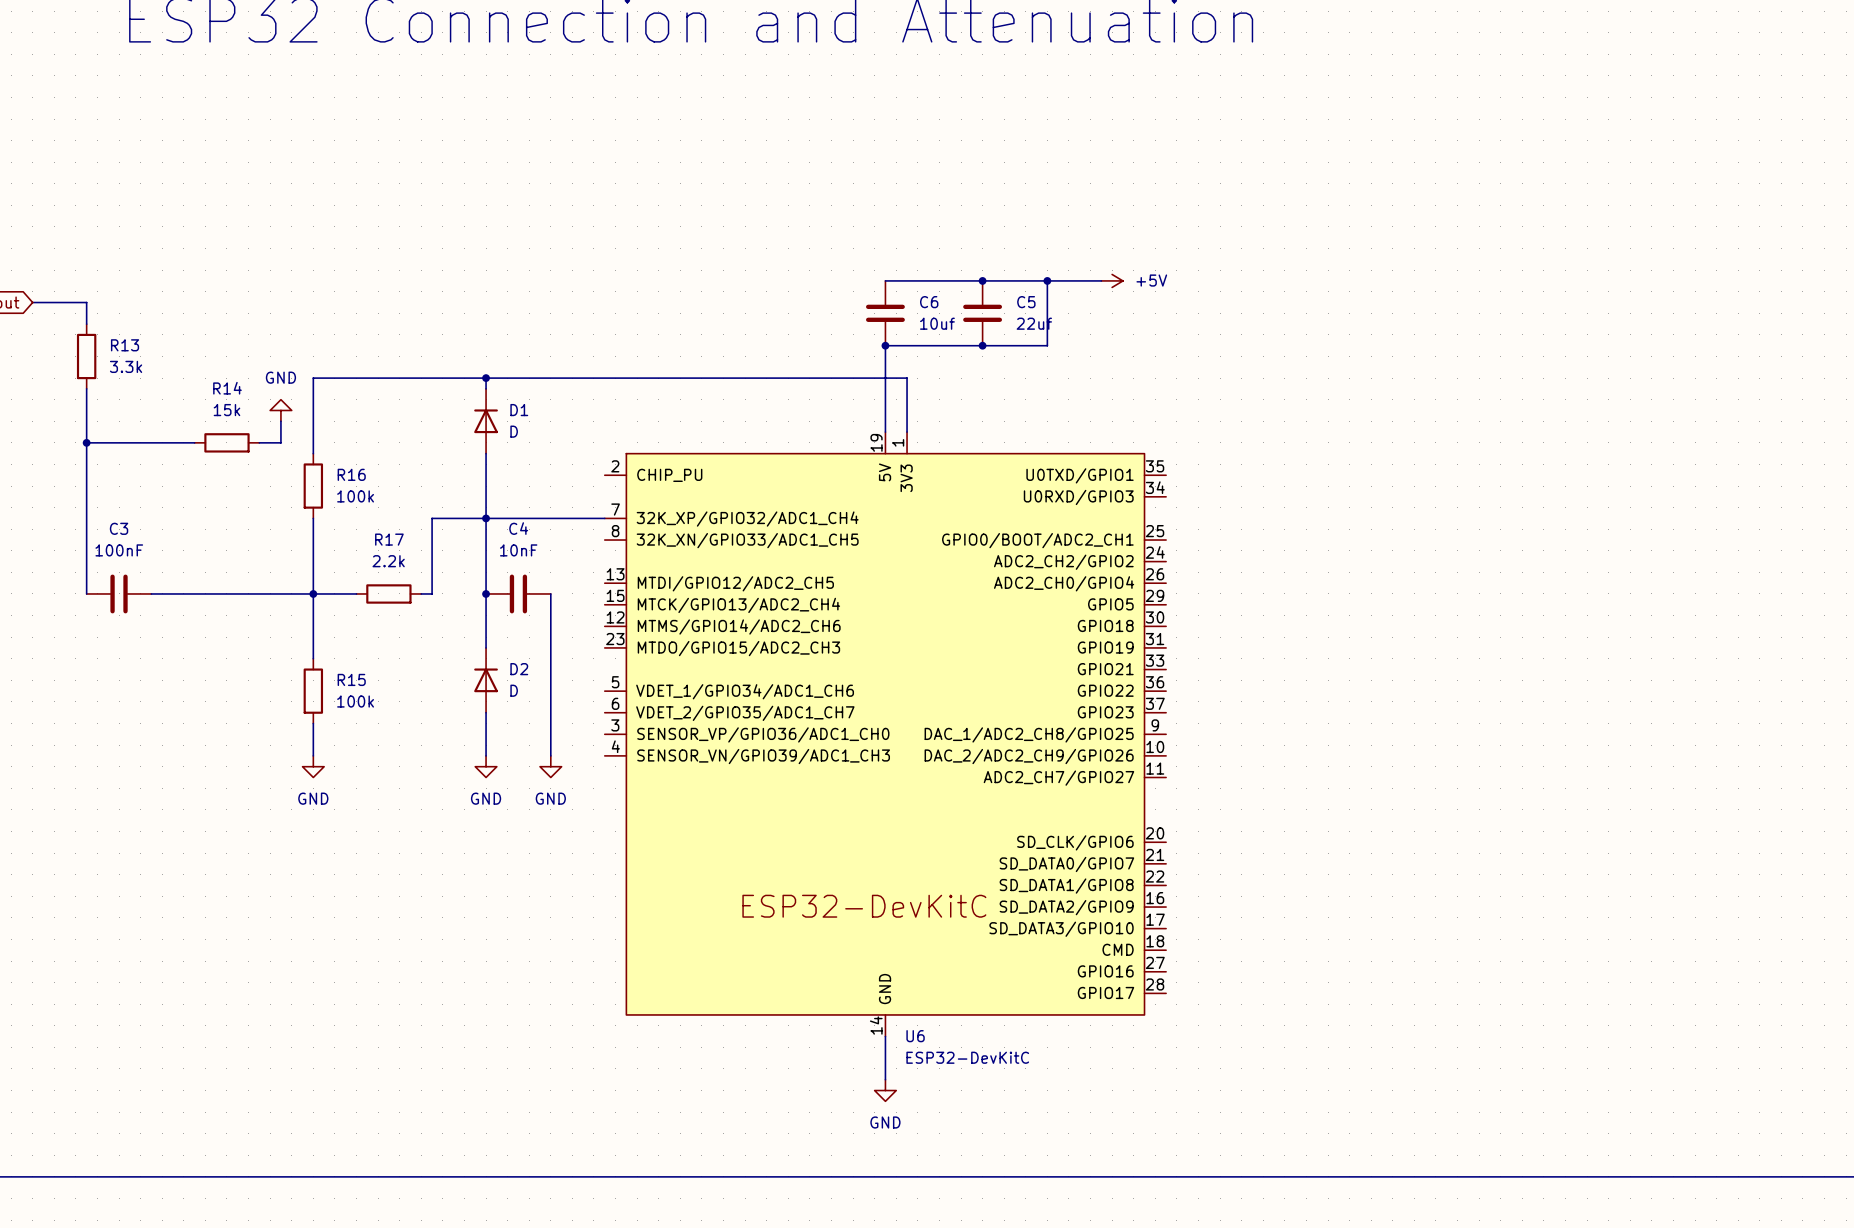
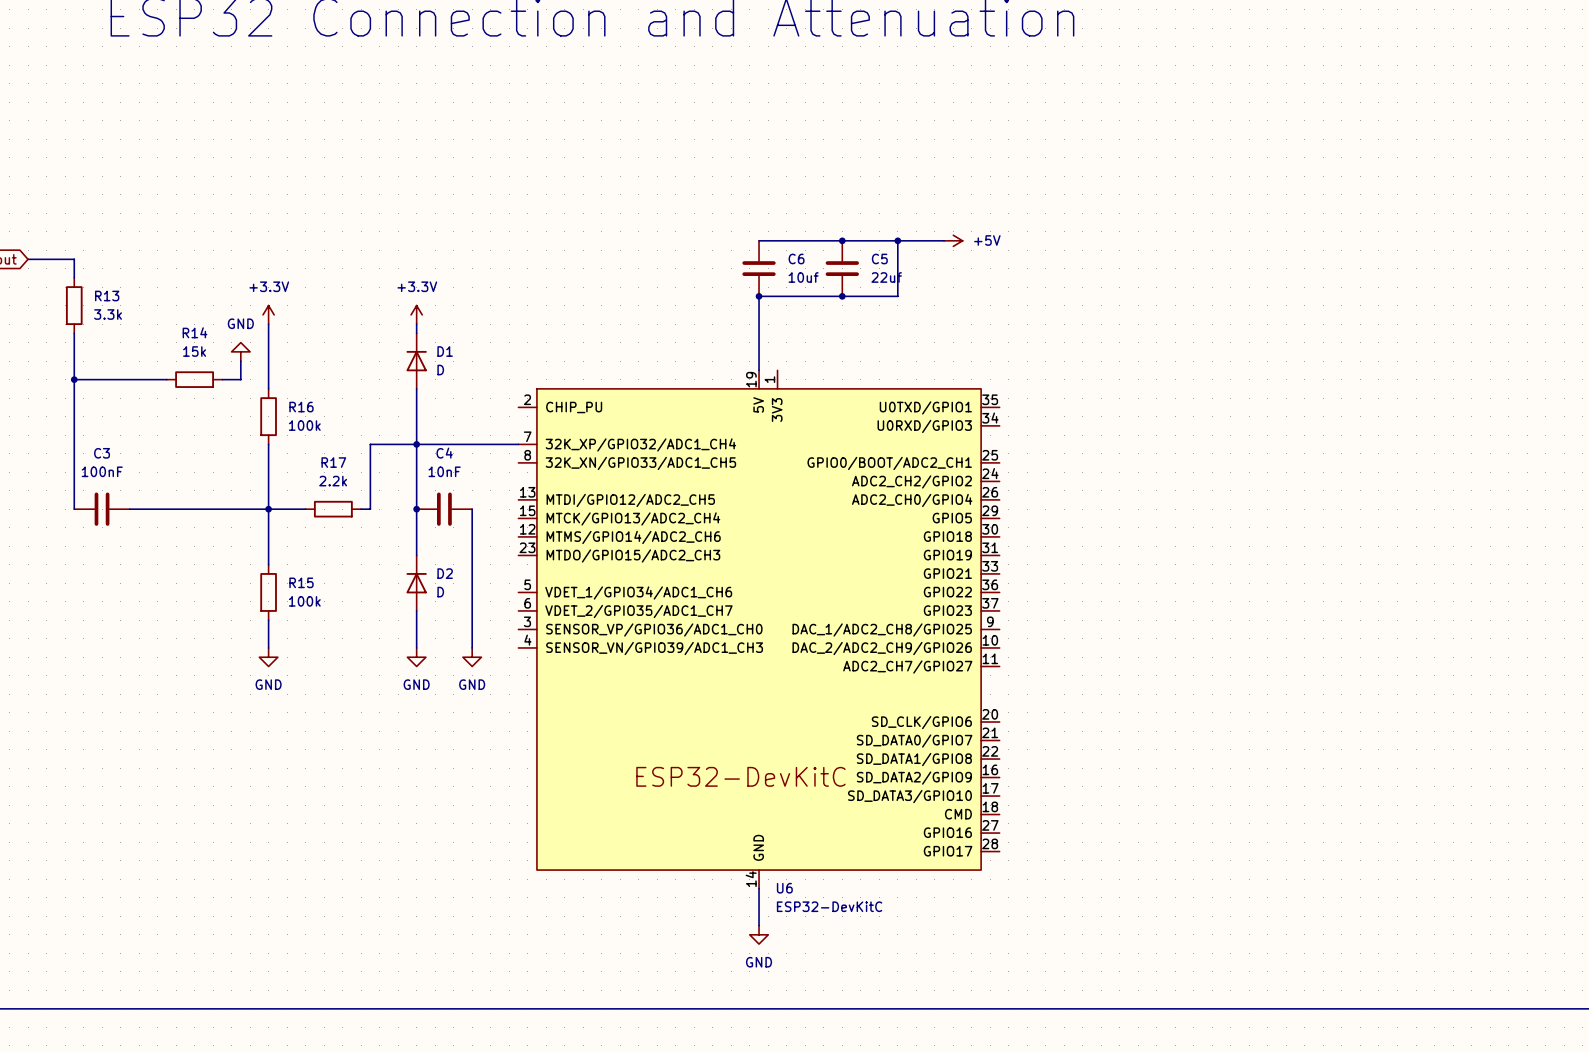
power symbol: none -> +3.3V (268, 314)
power symbol: none -> +3.3V (416, 314)
wire: (313, 378) (907, 378) (907, 432) -> none
junction: (486, 378) -> none

